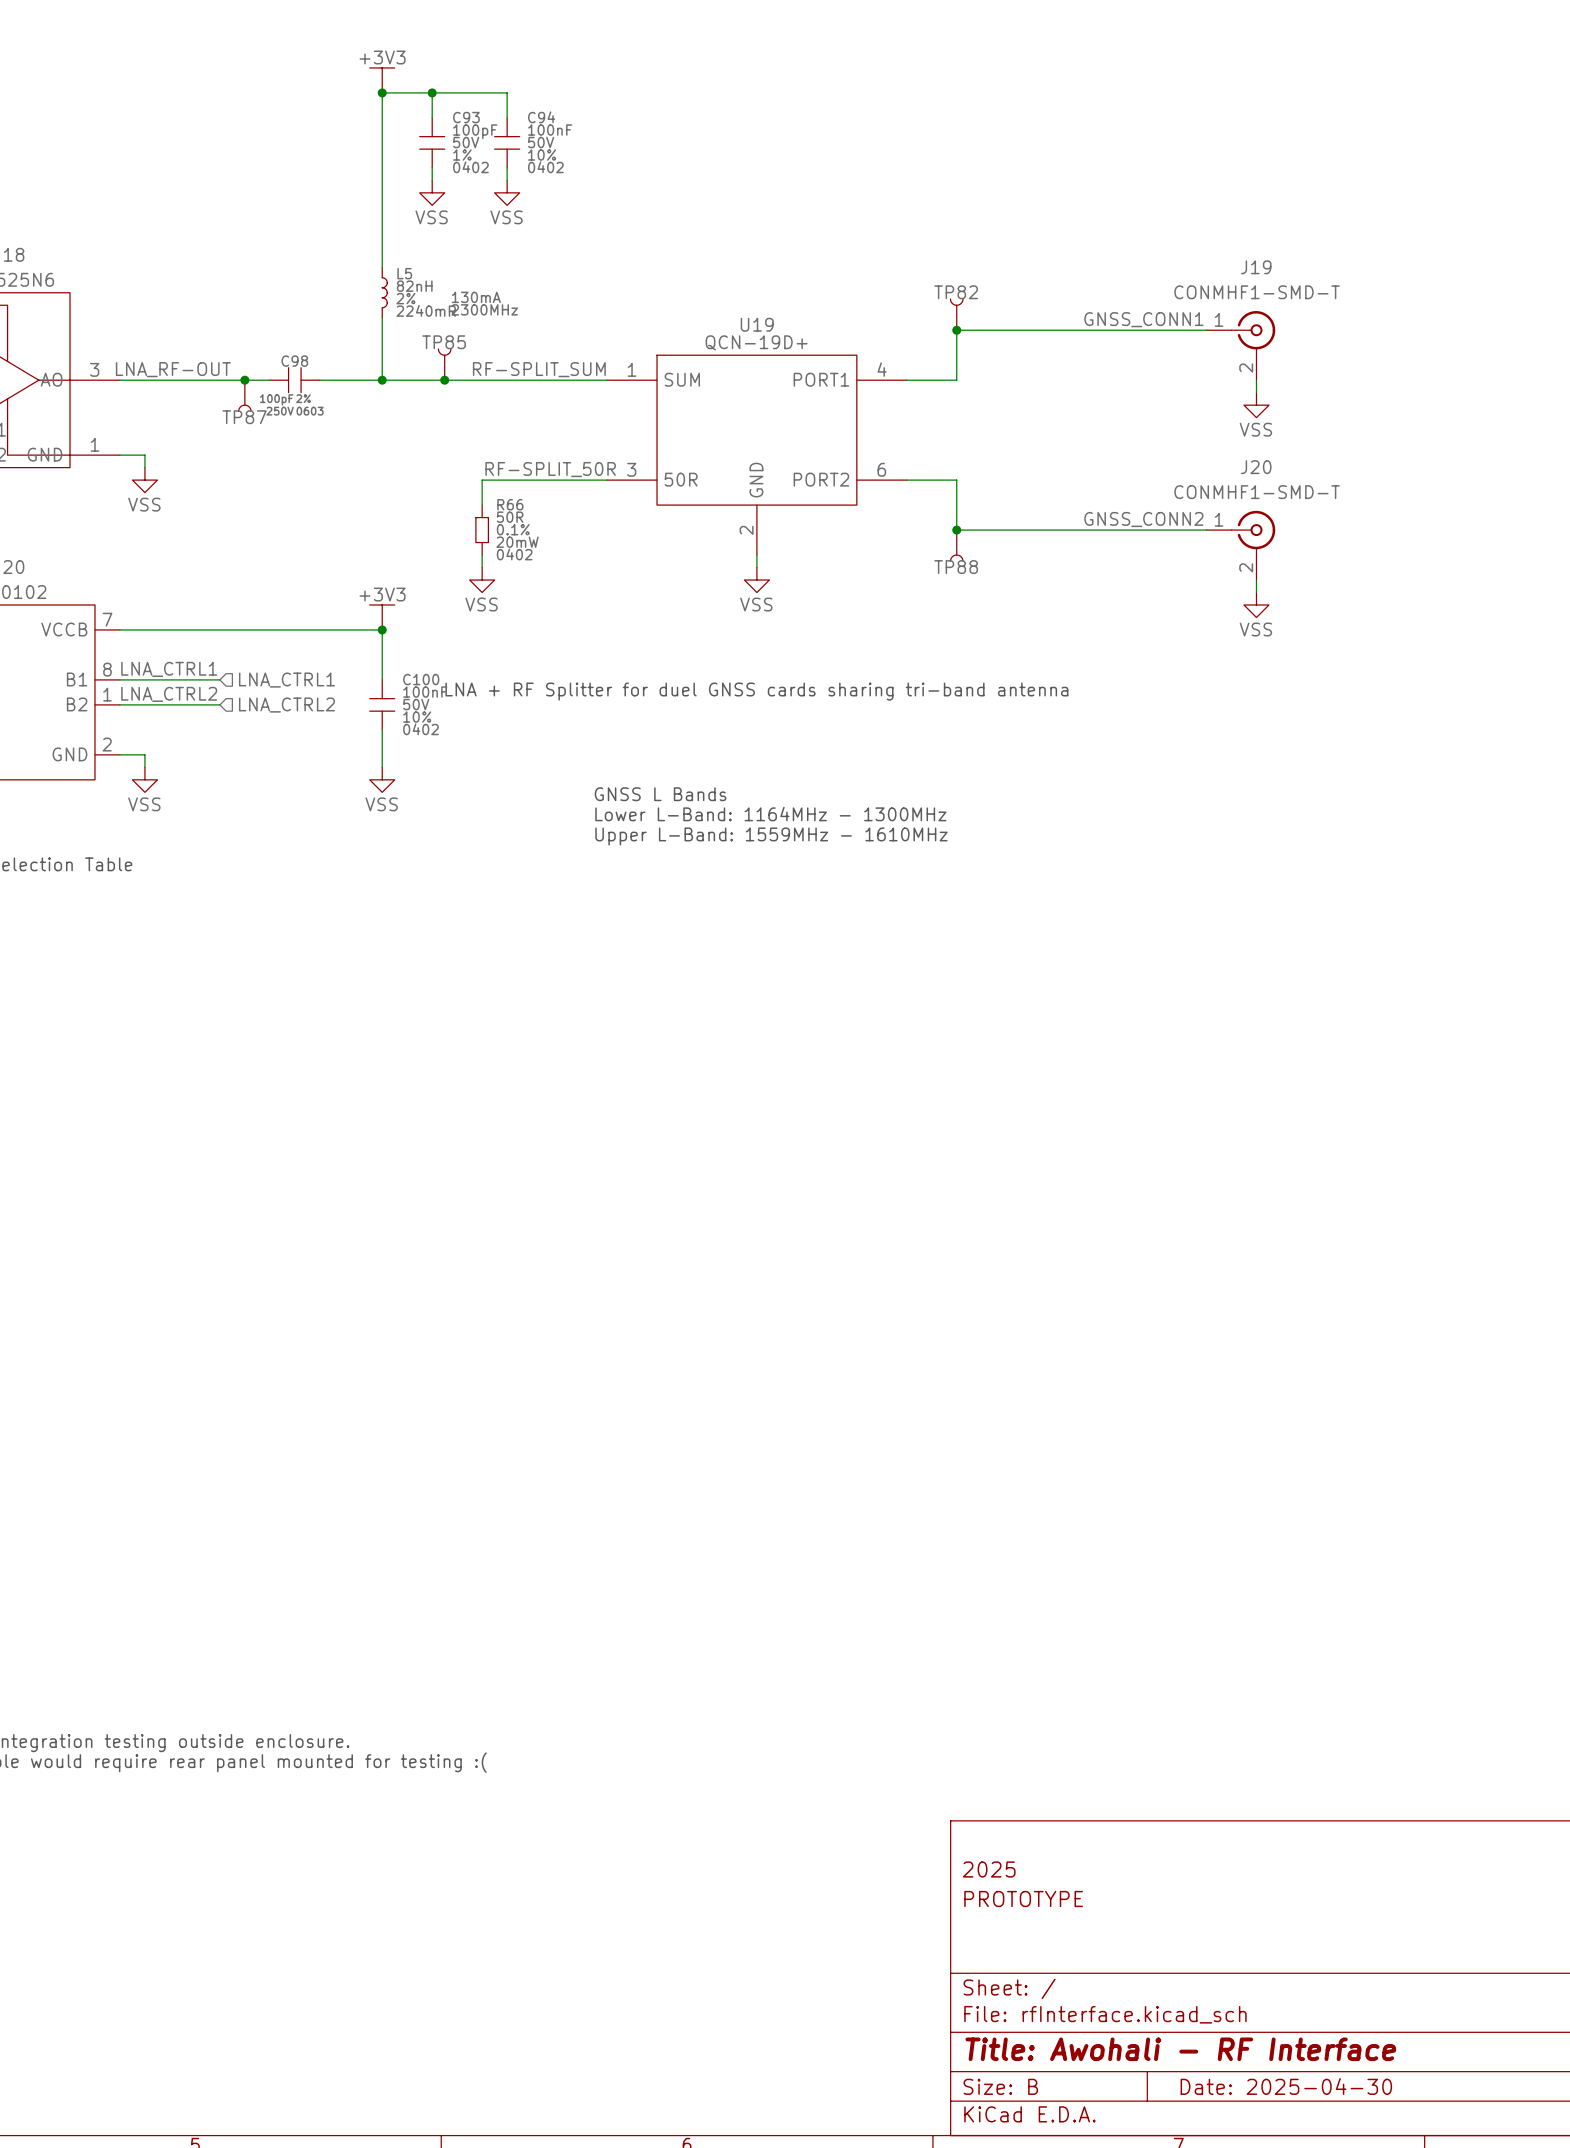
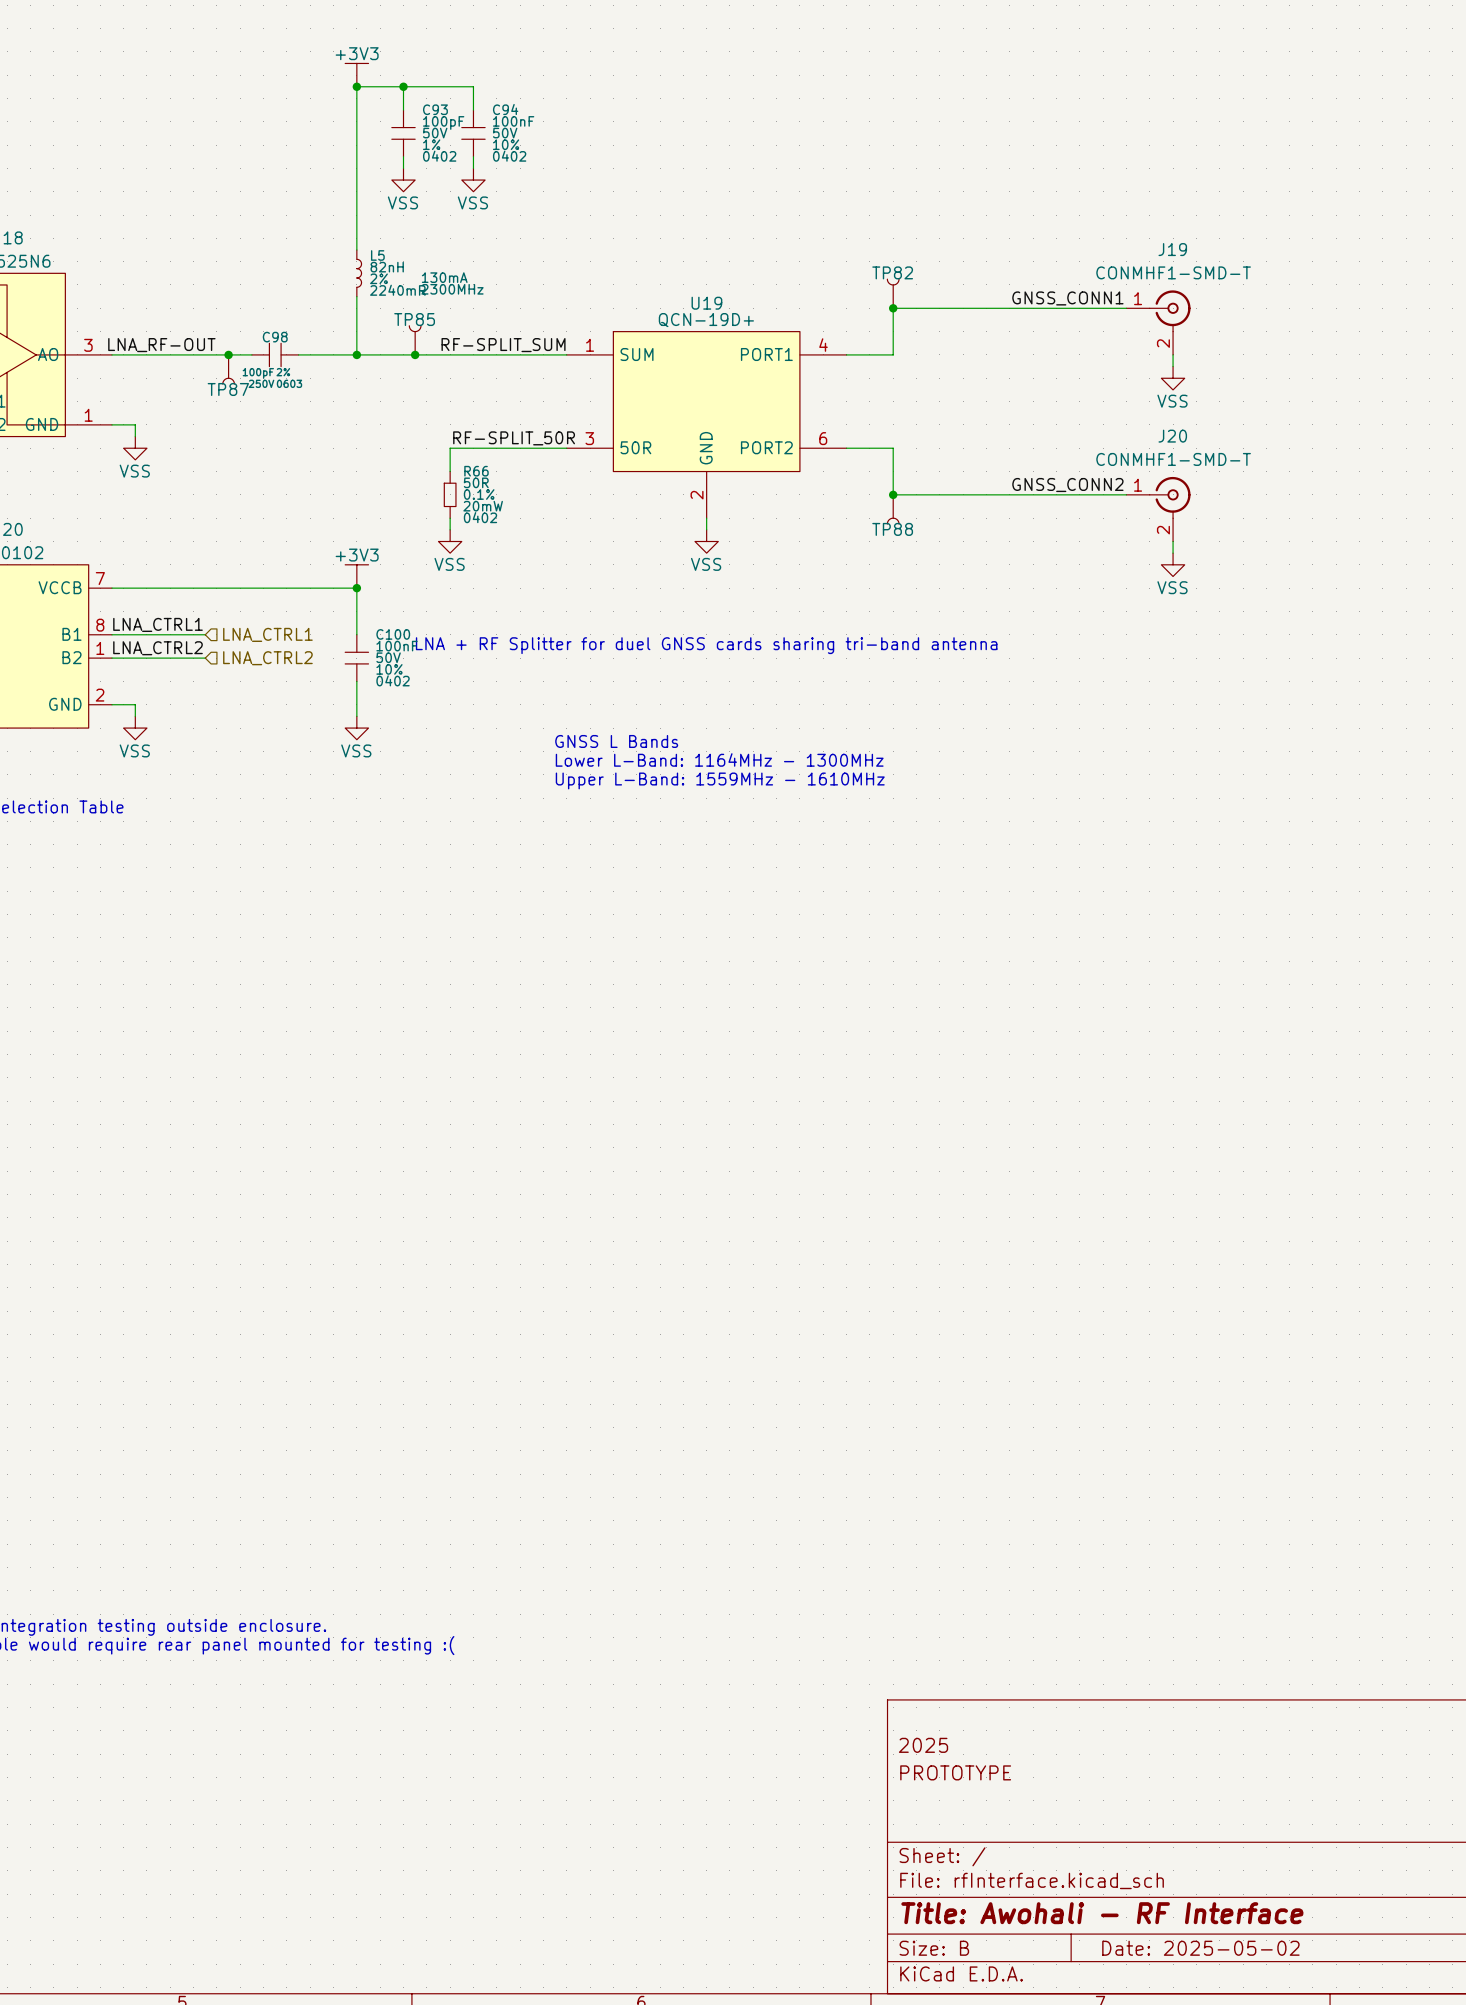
title block: Date: 2025-04-30 (1286, 2086) -> Date: 2025-05-02 (1200, 1948)

